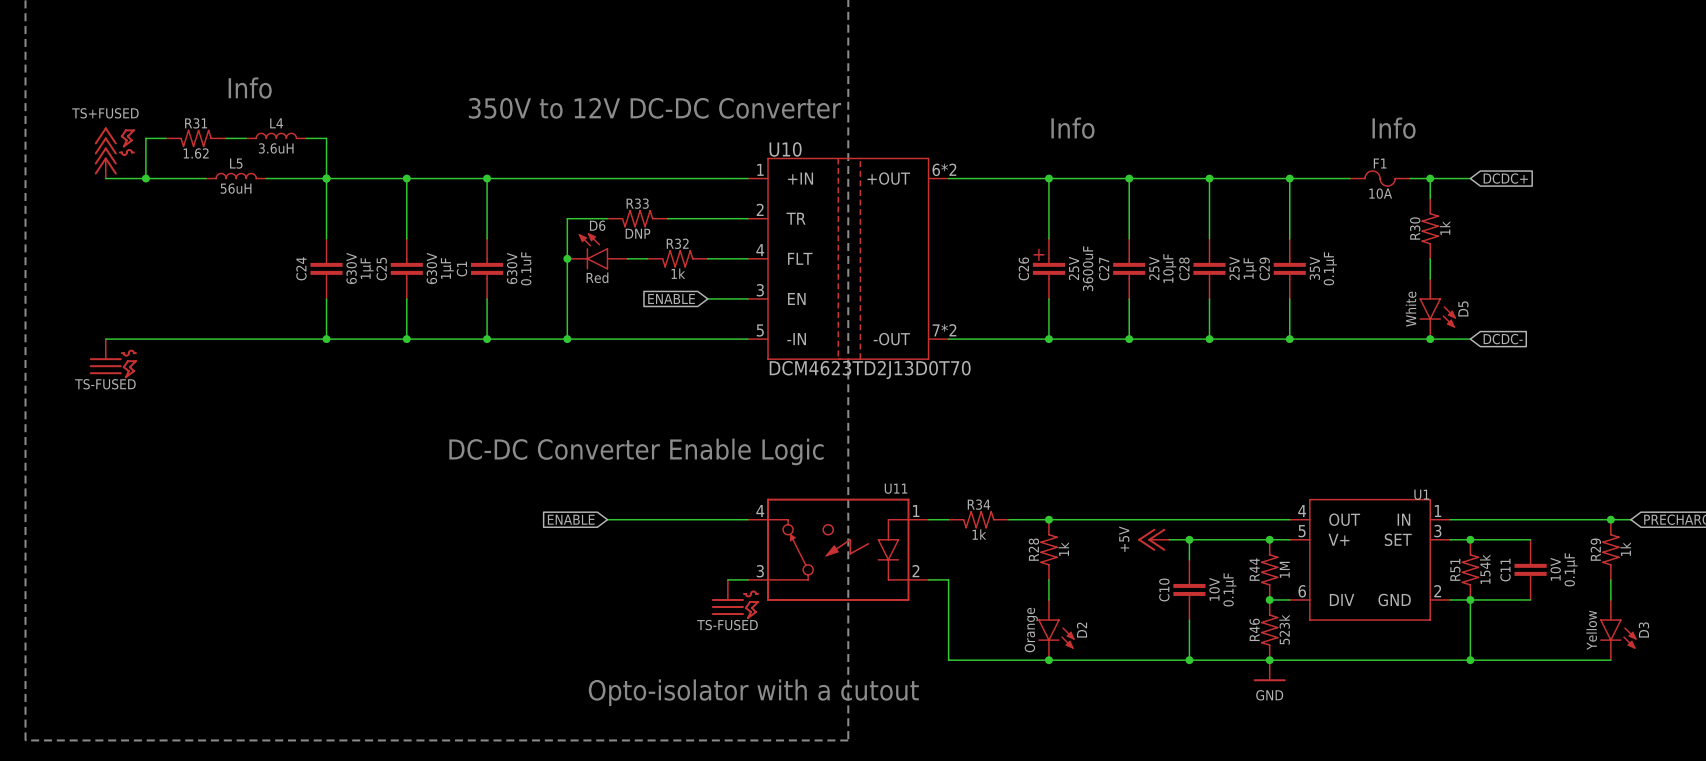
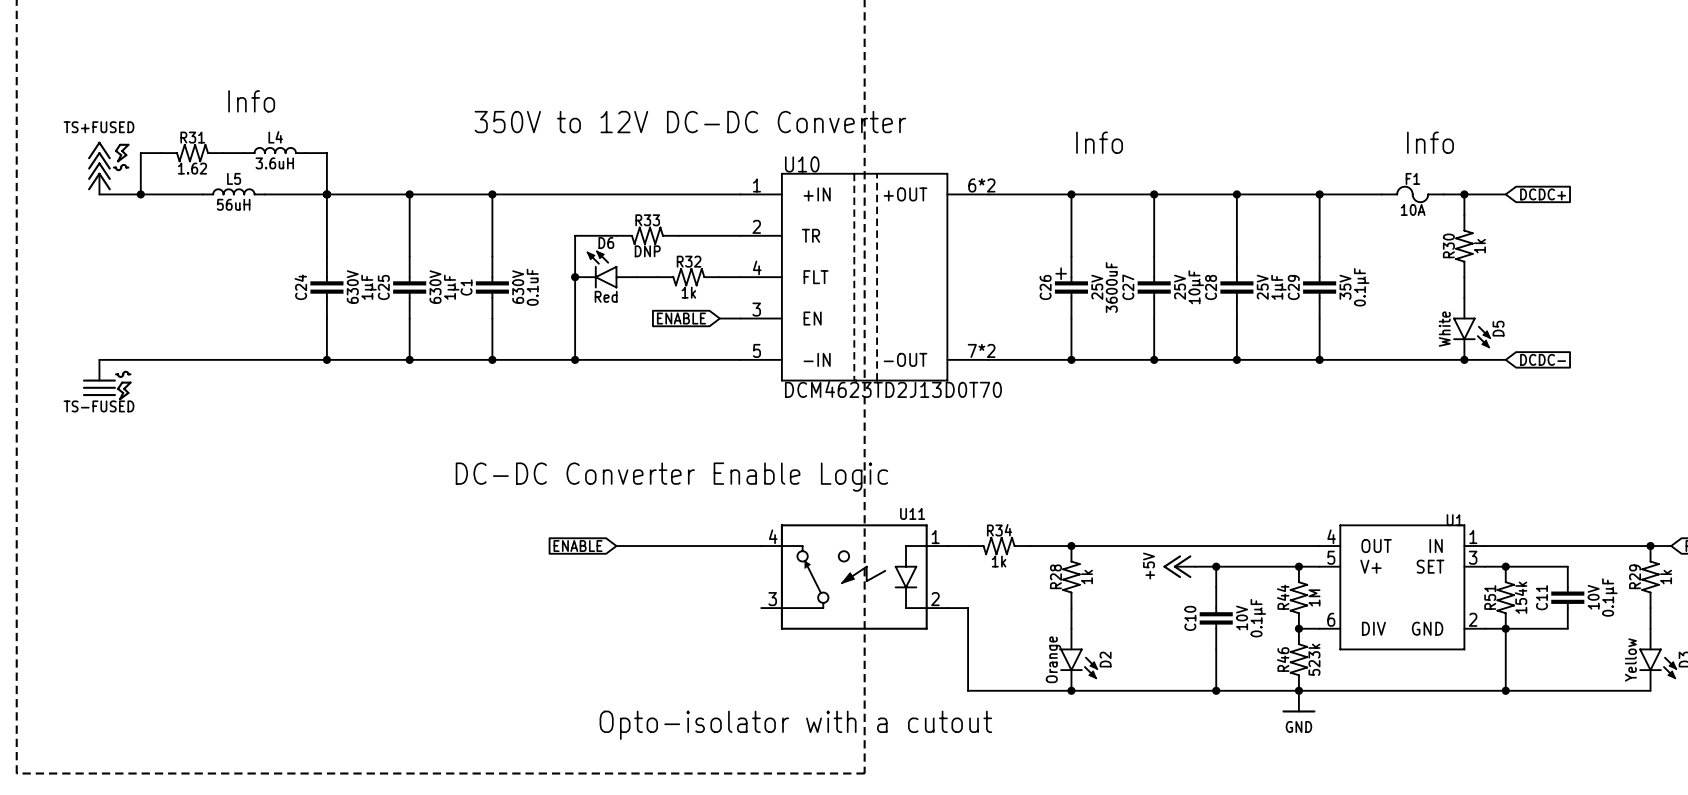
U10 symbol: [747, 157, 949, 360] -> [740, 173, 989, 382]
wire: (727, 579) (747, 579) -> none
power symbol: TS-FUSED (735, 599) -> none

